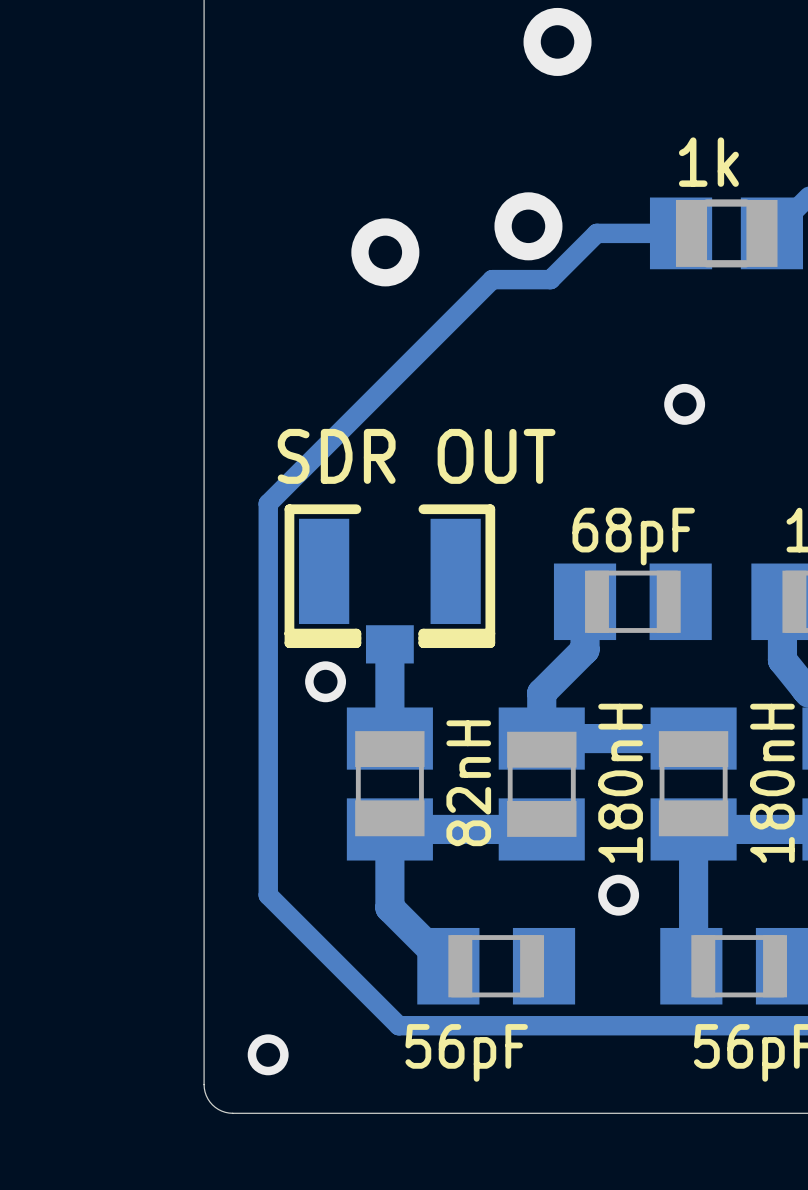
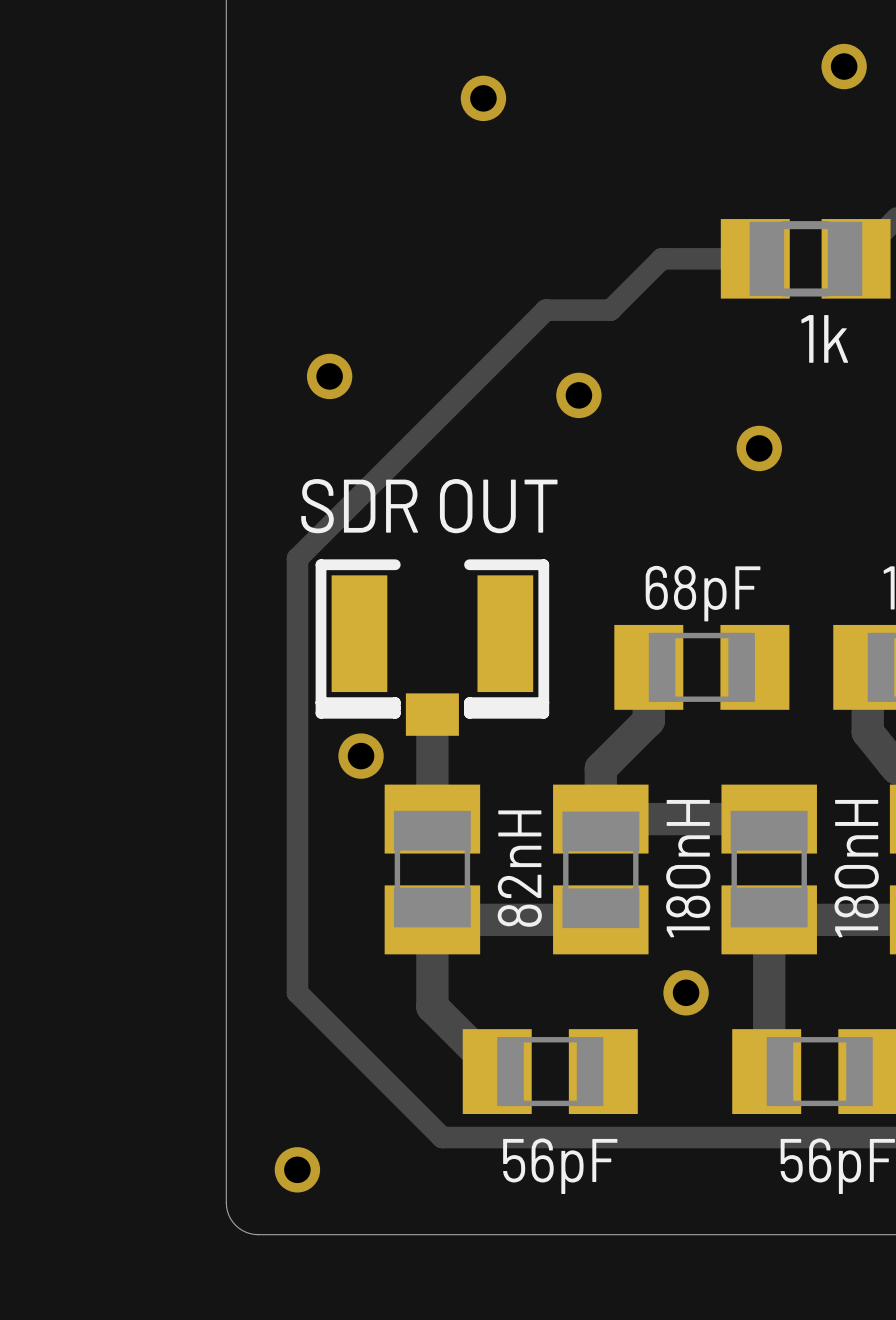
via: (557, 41) -> none
via: none -> (844, 66)
via: none -> (483, 98)
part value position: 1k (708, 162) -> 1k (824, 338)
via: (528, 226) -> none
via: (385, 252) -> none
via: none -> (329, 376)
via: none -> (578, 395)
text position: 56pF (466, 1052) -> 56pF (560, 1166)

